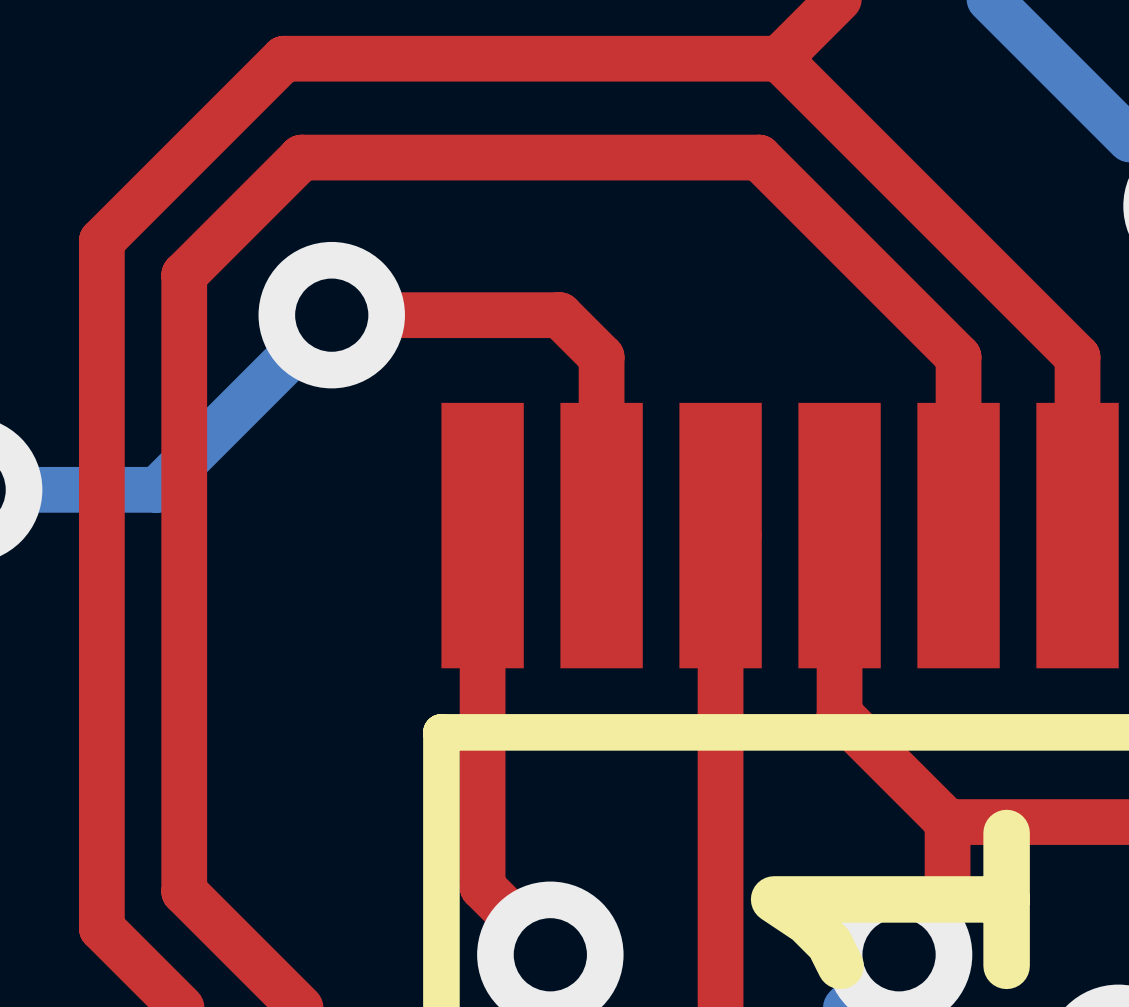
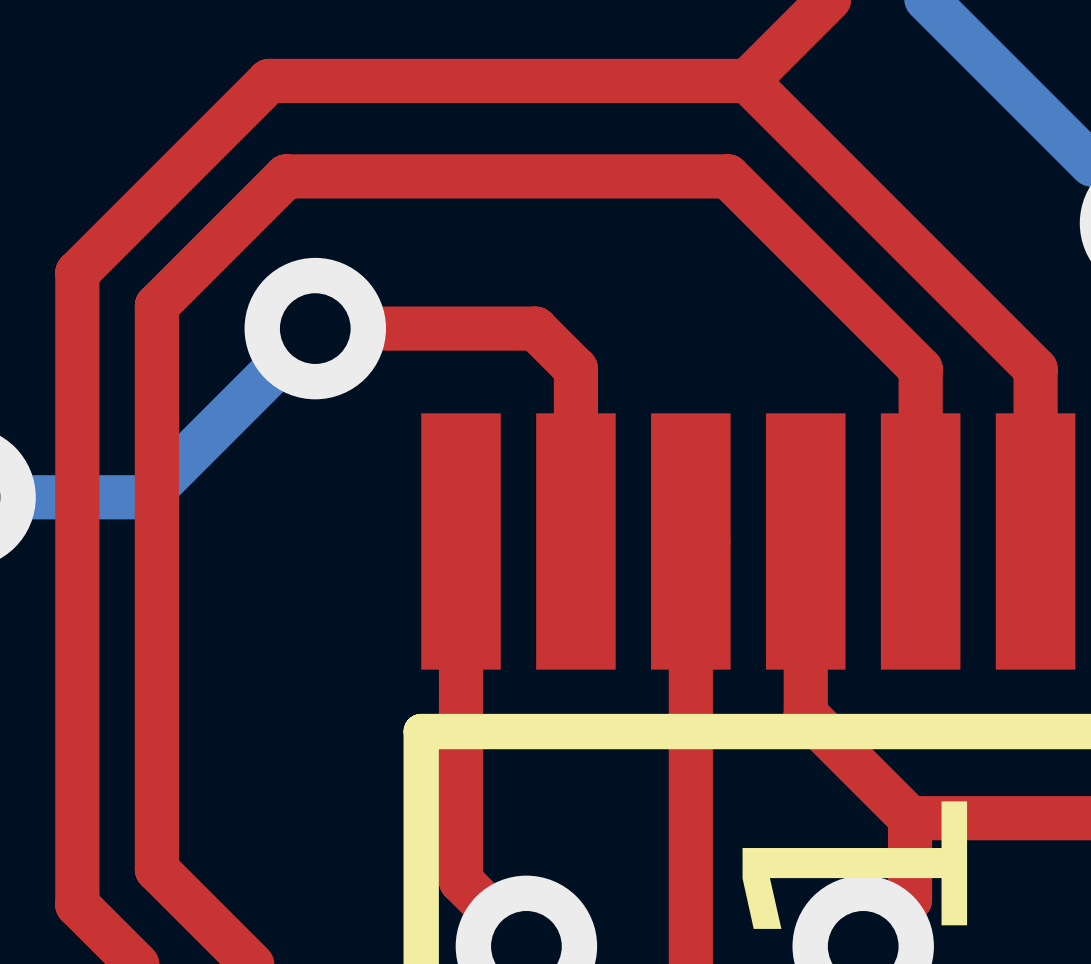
top track: (101, 240) (101, 928) -> (93, 256) (77, 272) (77, 904) (93, 920)
top track: (184, 274) (184, 891) -> (172, 289) (156, 305) (156, 869) (172, 885)

